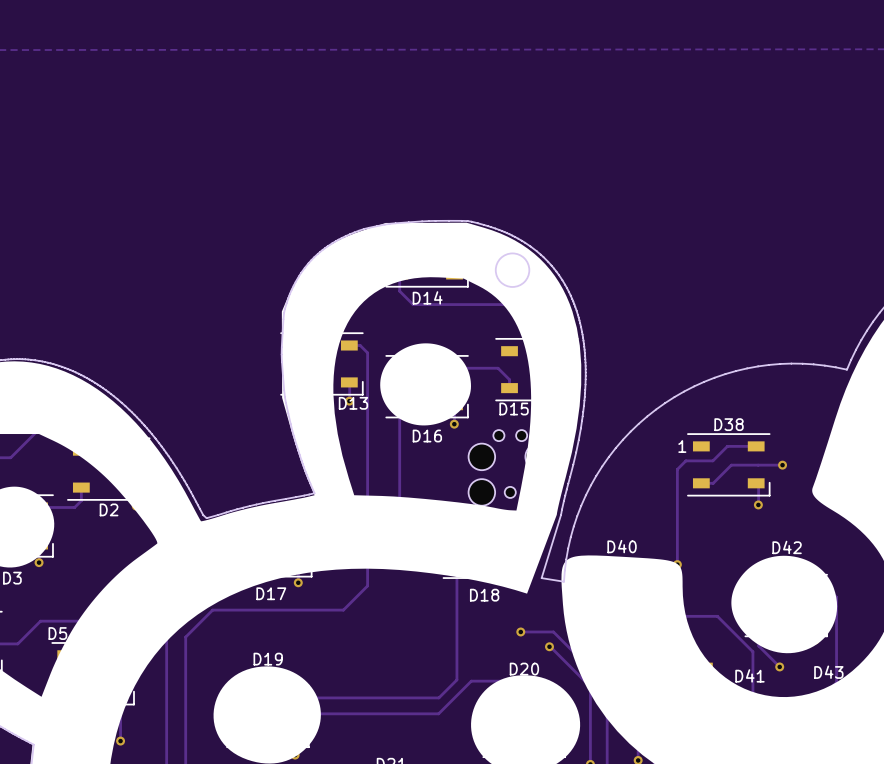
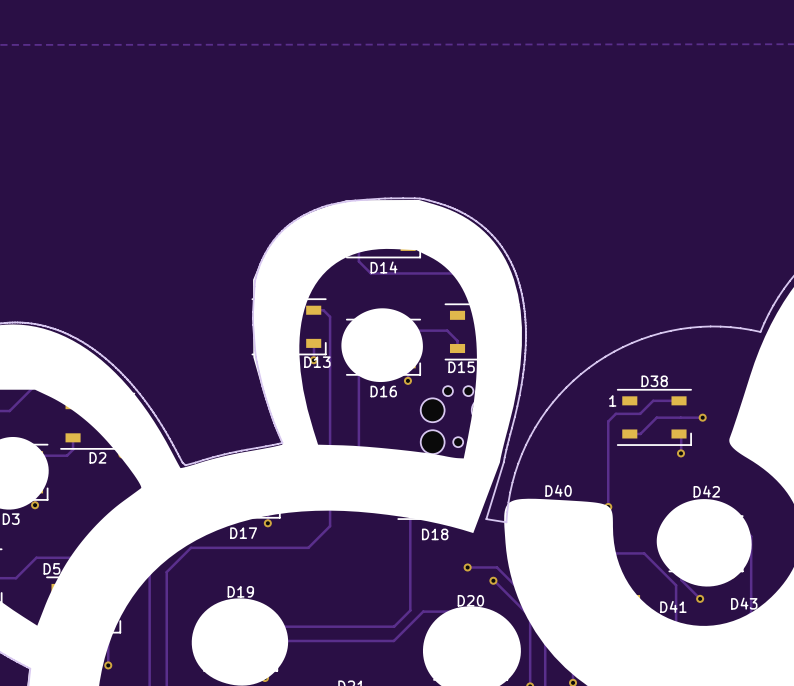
round board edge: [495, 252, 530, 288] -> none

